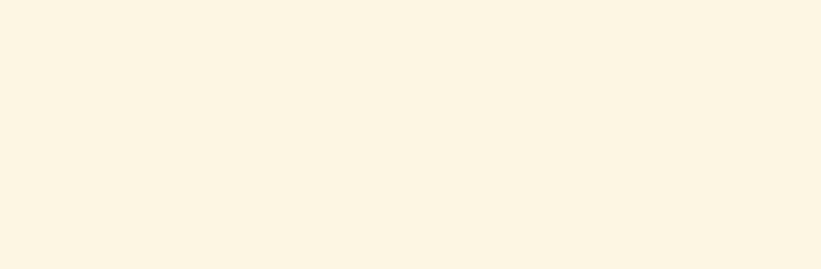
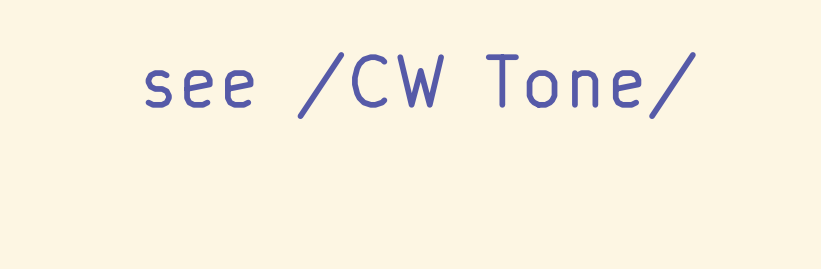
text: none -> see /CW Tone/ (420, 85)

